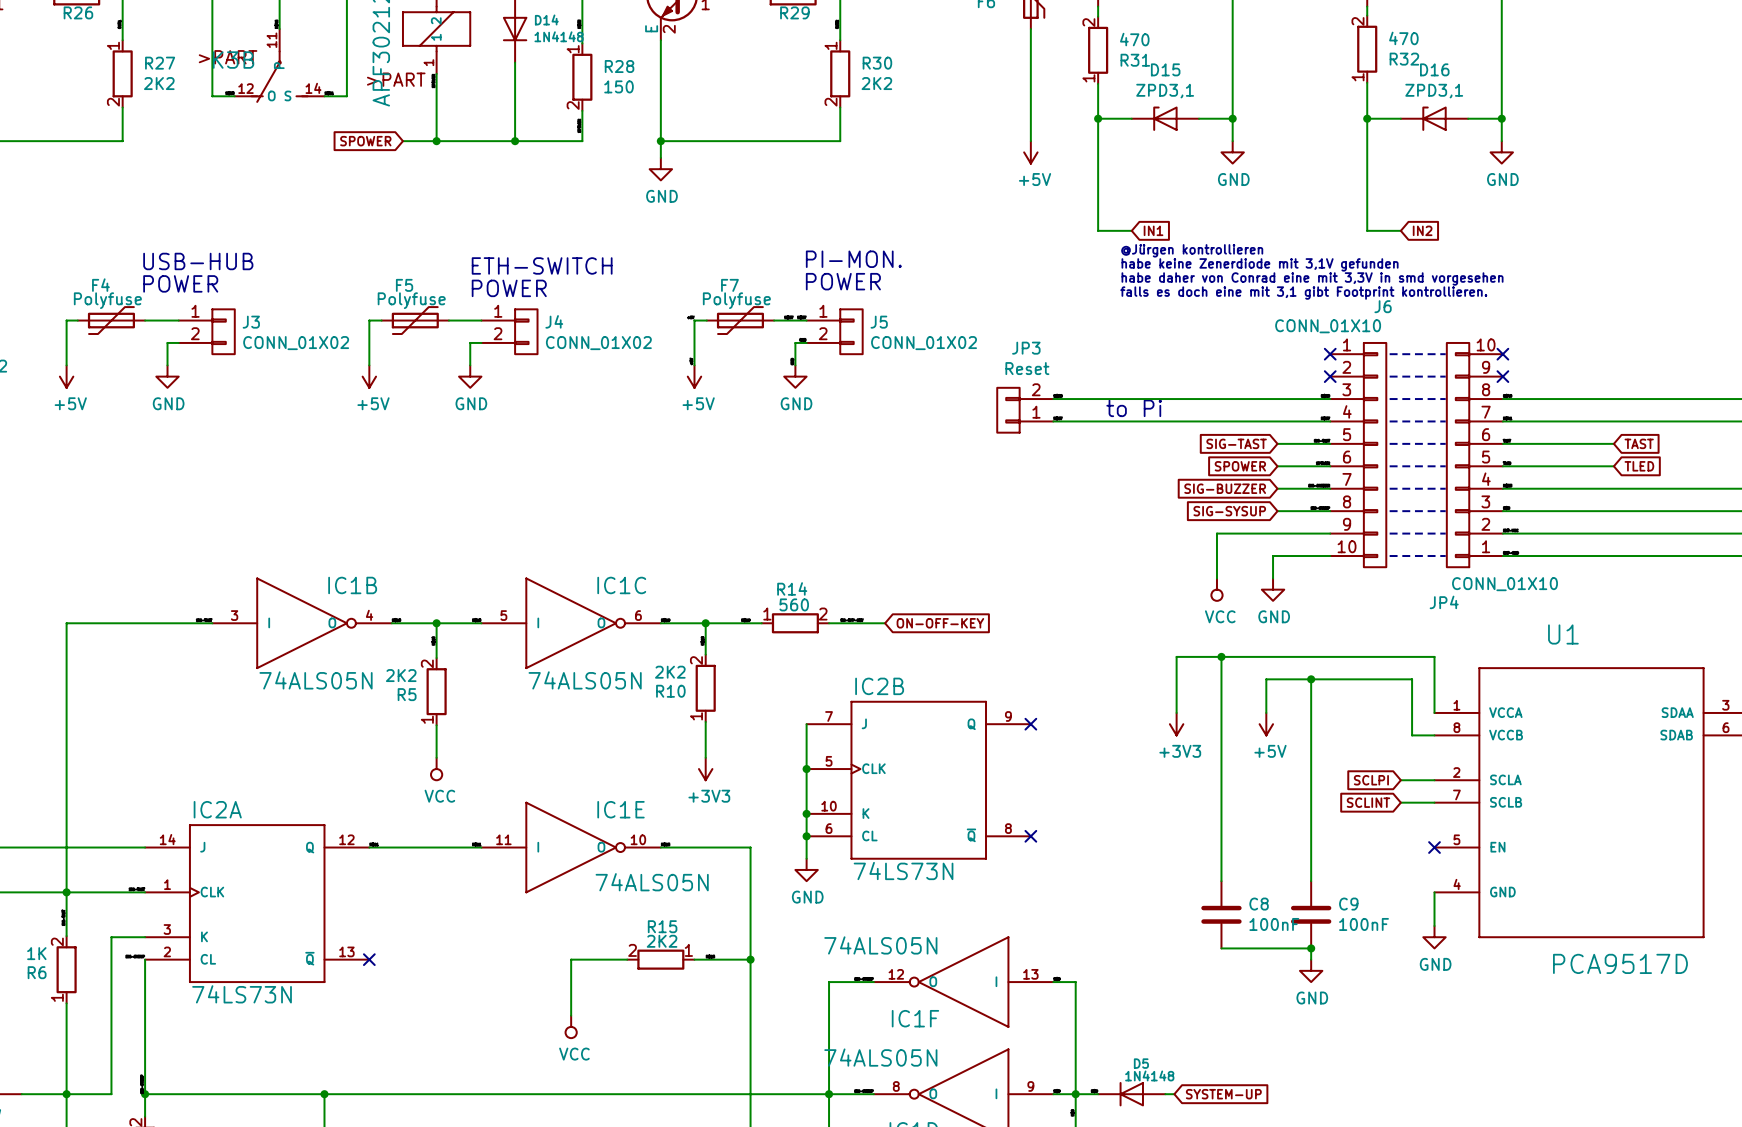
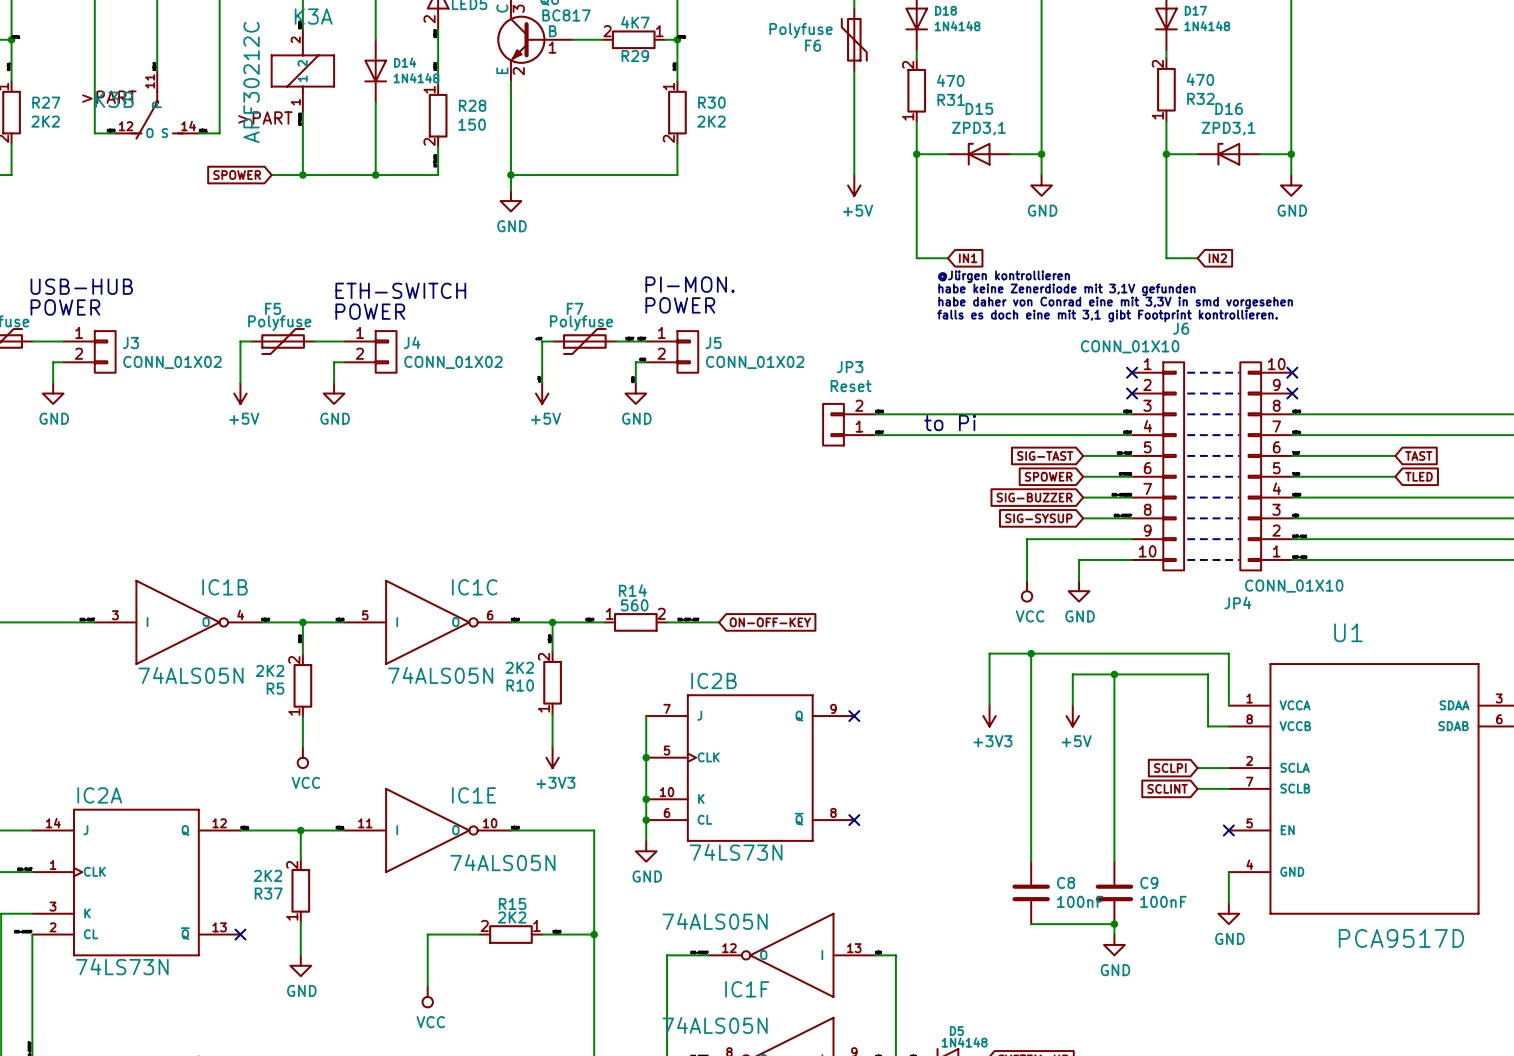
wire: none -> (300, 830) (300, 859)
junction: none -> (300, 830)
R37: none -> 2K2 (300, 890)
wire: none -> (300, 922) (300, 955)
power symbol: none -> GND (300, 965)

